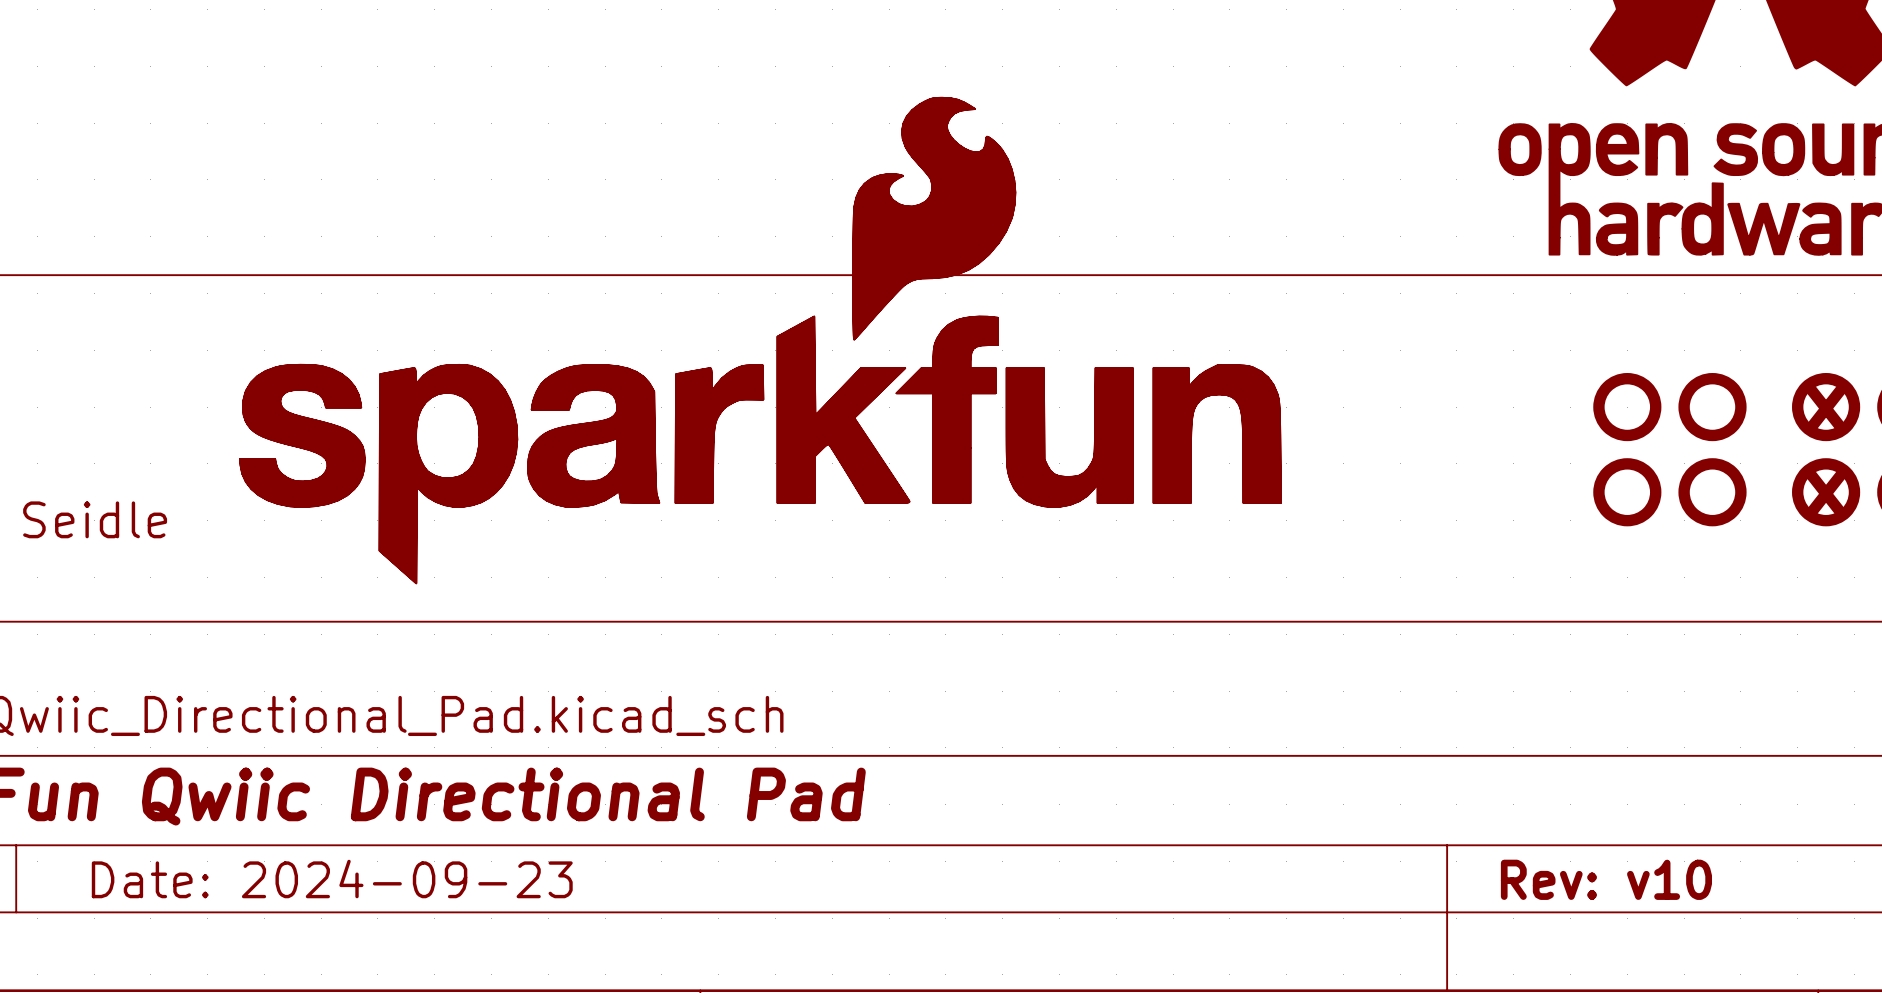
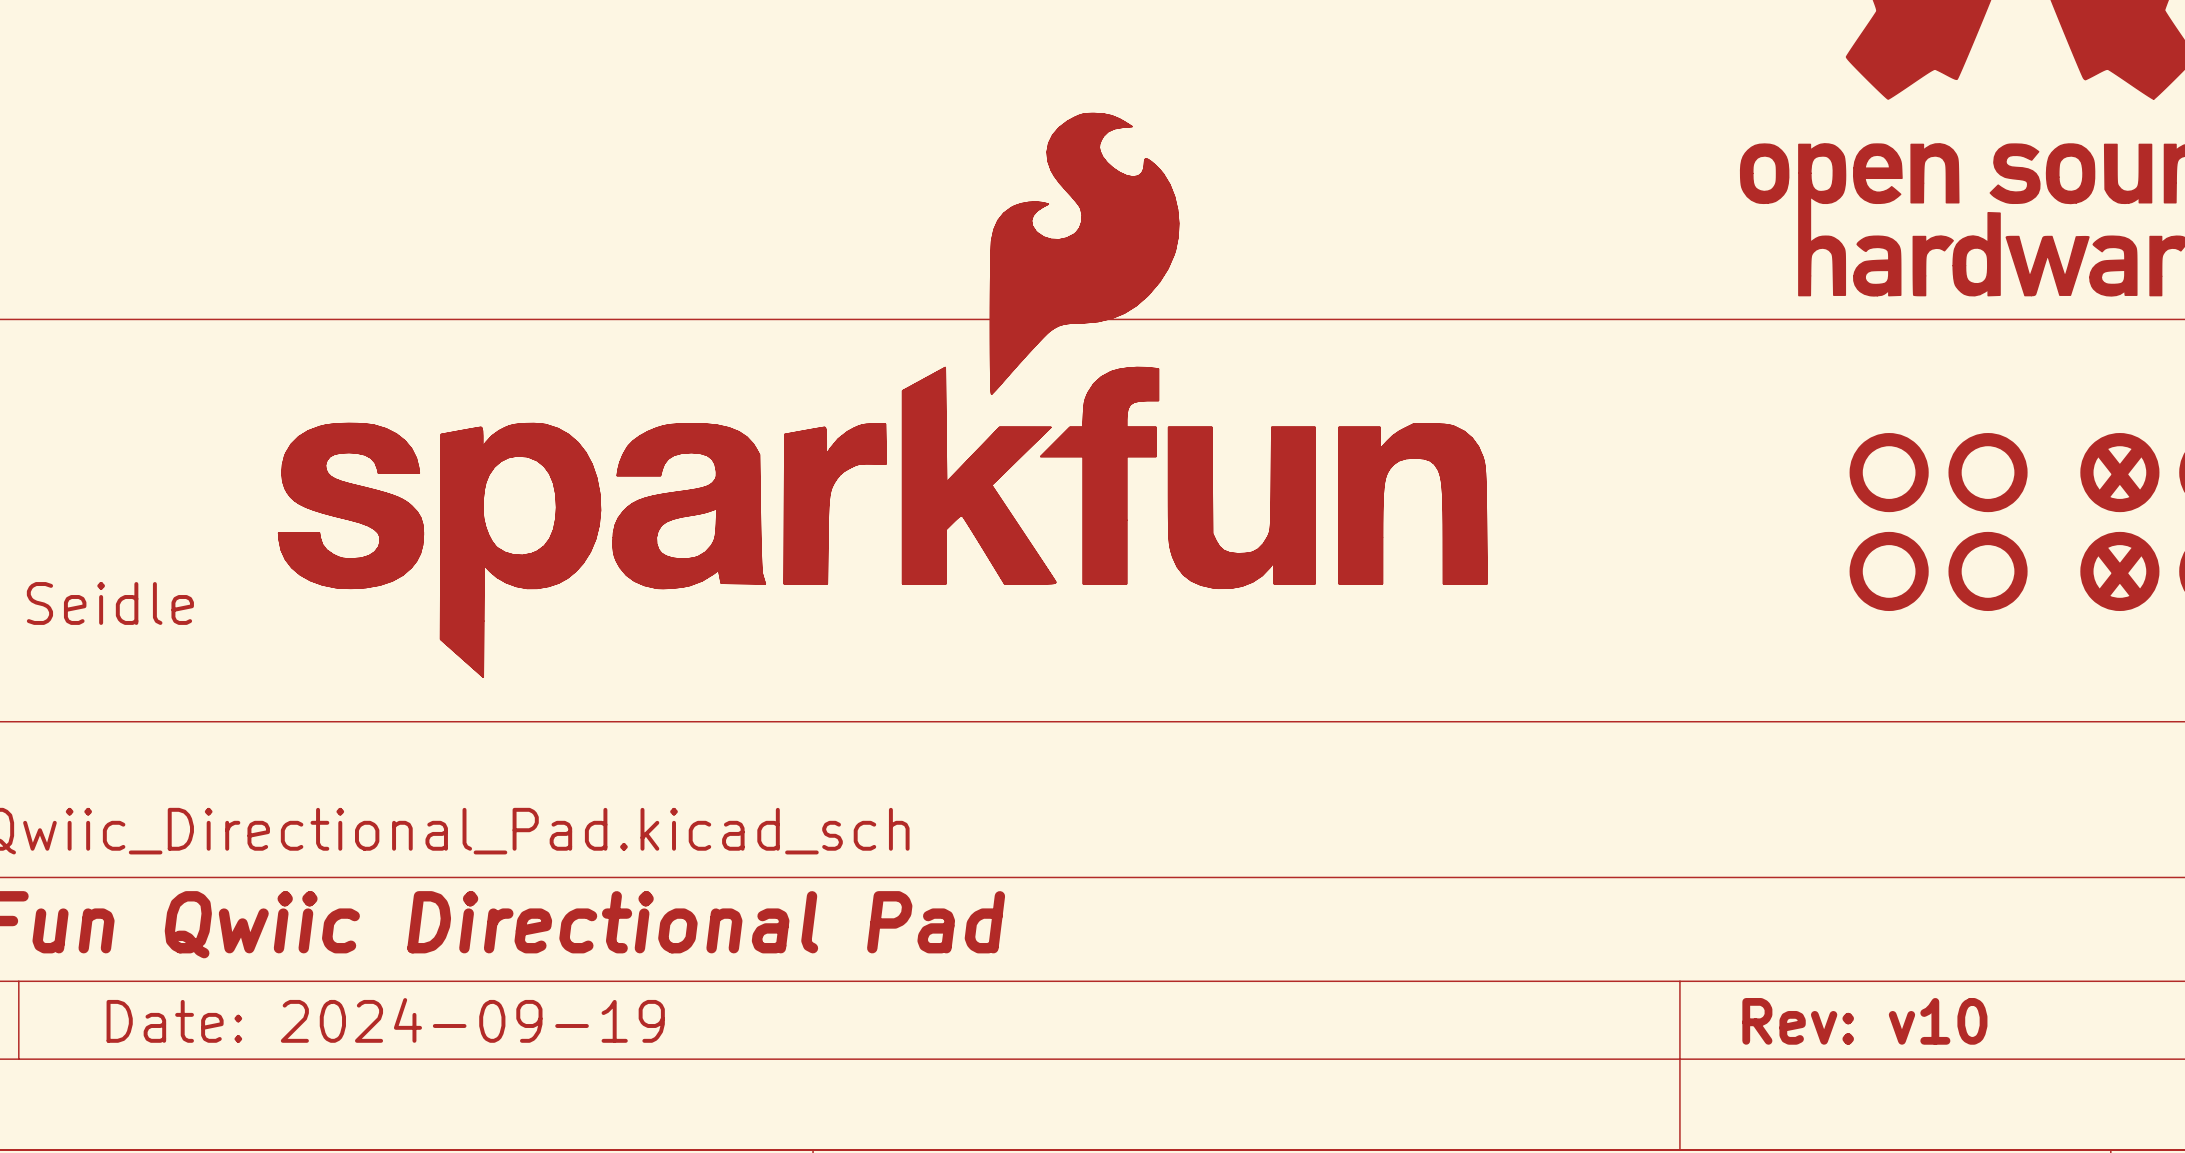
title block: Date: 2024-09-23 (332, 879) -> Date: 2024-09-19 (385, 1020)

